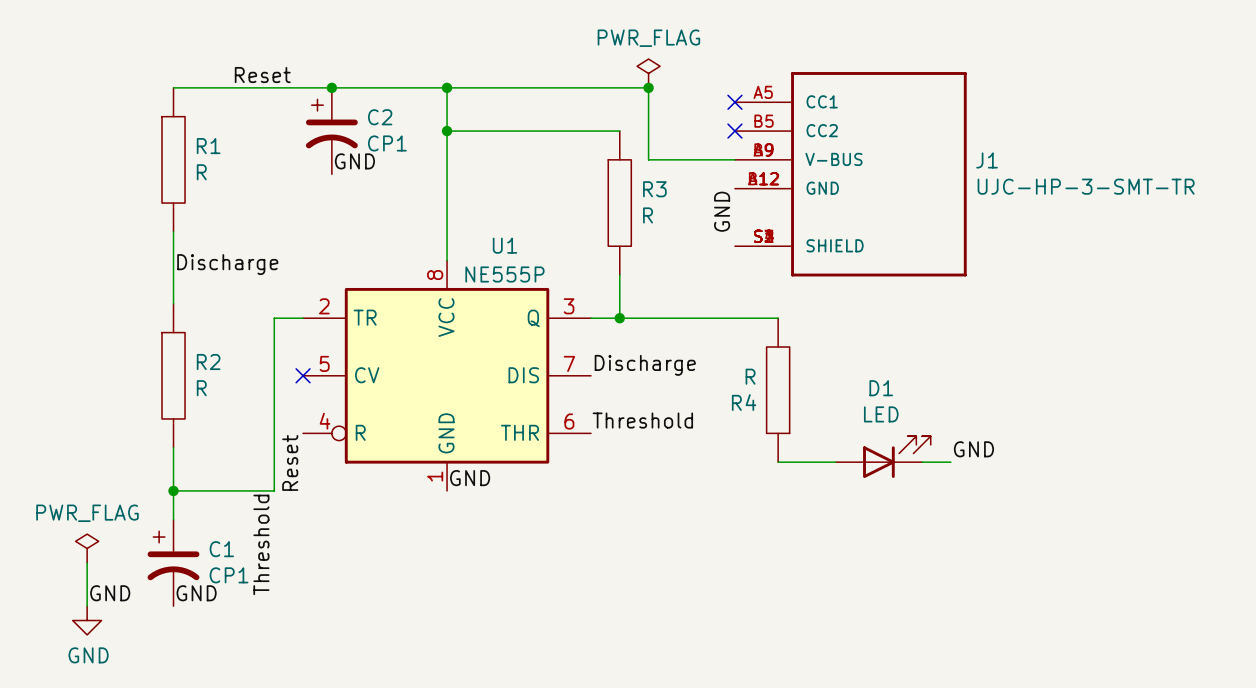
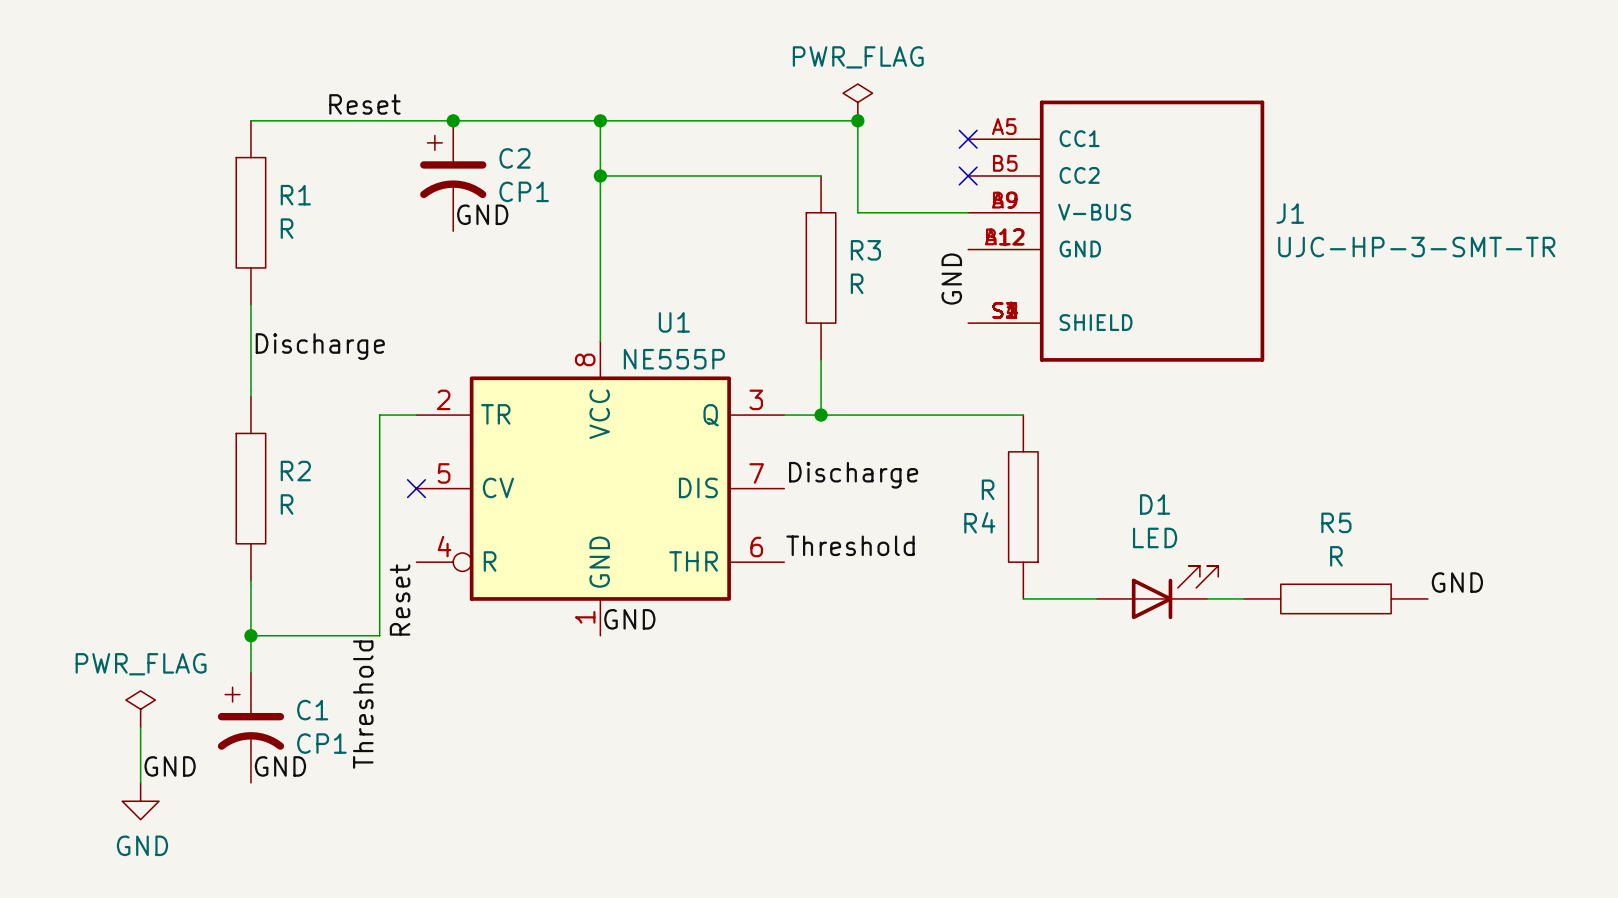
label position: GND (973, 449) -> GND (1457, 582)
R5: none -> R (1335, 598)

